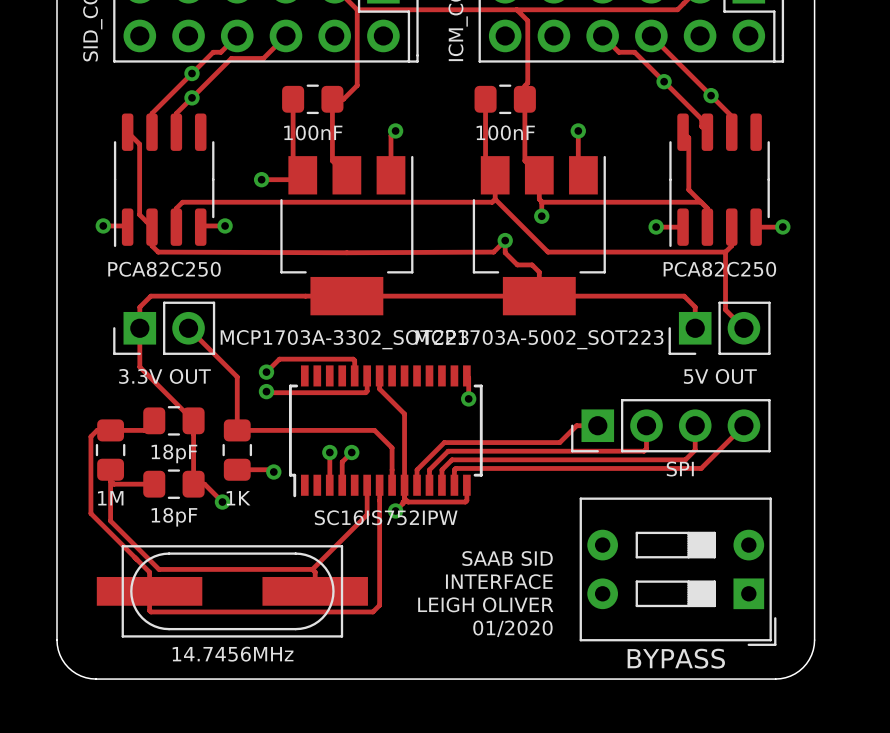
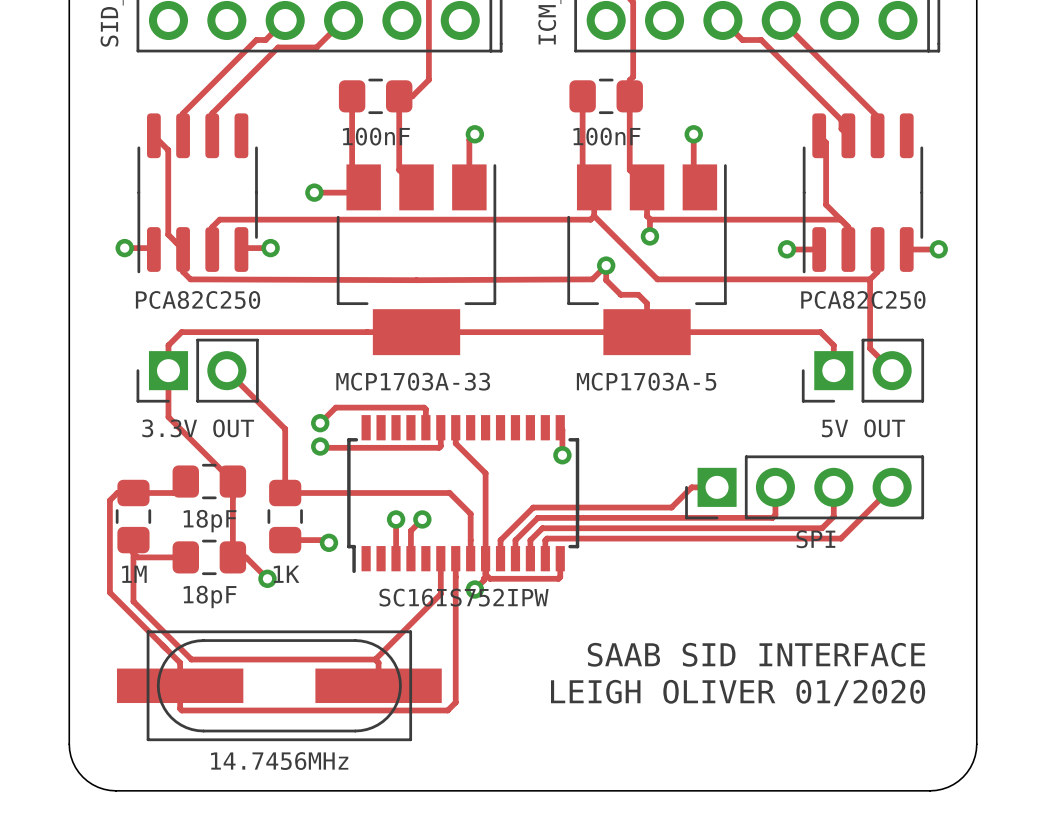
via: (191, 73) -> none
via: (664, 81) -> none
via: (711, 95) -> none
via: (191, 97) -> none
part value: MCP1703A-3302_SOT223 (344, 339) -> MCP1703A-33 (413, 381)
part value: MCP1703A-5002_SOT223 (539, 339) -> MCP1703A-5 (646, 381)
text: SAAB SID (507, 558) -> none
text: none -> SAAB SID INTERFACE (756, 654)
BYPASS: (678, 571) -> none
text: INTERFACE (499, 581) -> none
text: LEIGH OLIVER (485, 604) -> LEIGH OLIVER 01/2020 (738, 693)
text: 01/2020 (512, 628) -> none

